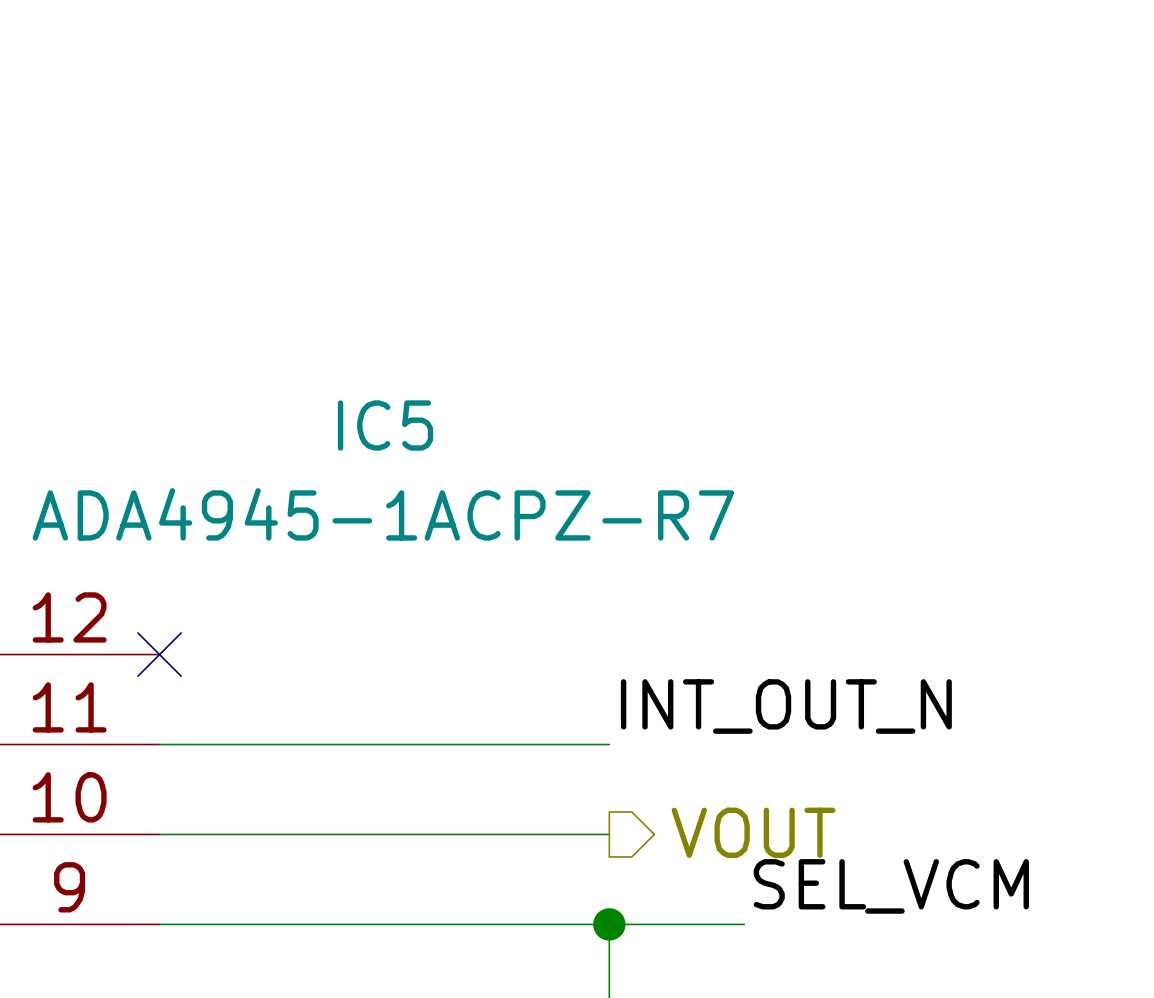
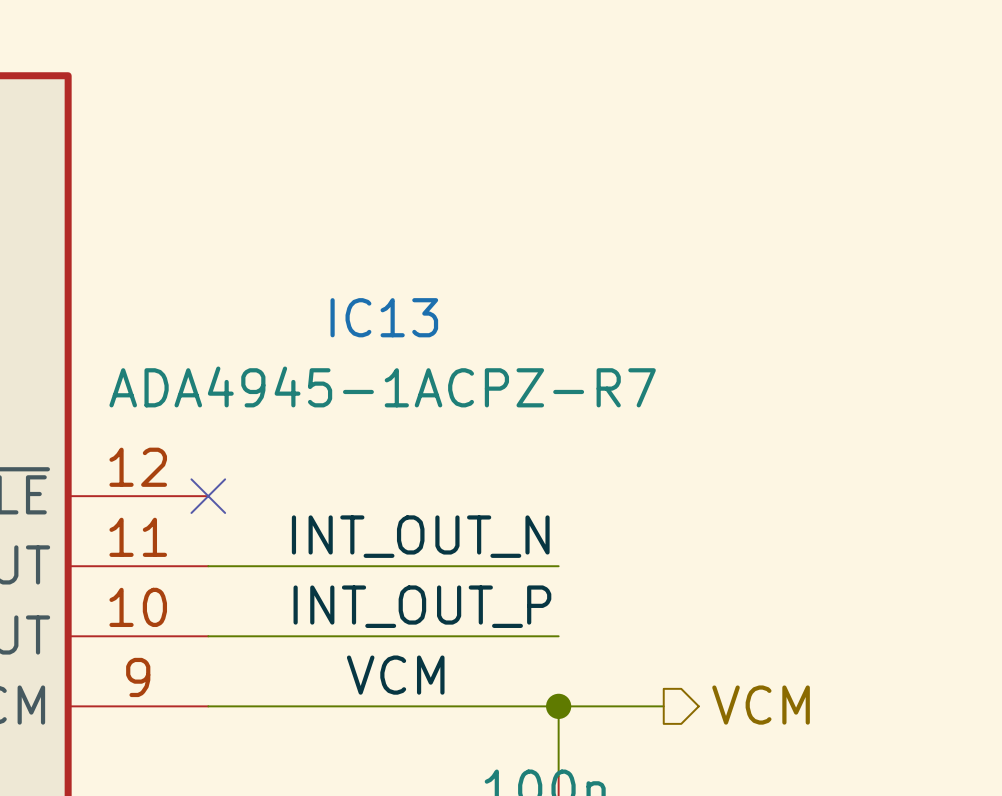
IC5 name: IC5 (385, 425) -> IC13 (384, 317)
label position: INT_OUT_N (786, 706) -> INT_OUT_N (420, 536)
label: none -> INT_OUT_P (422, 606)
hierarchical label: VOUT (753, 832) -> none
label: none -> VCM (395, 675)
label: SEL_VCM (891, 886) -> none
hierarchical label: none -> VCM (761, 705)

